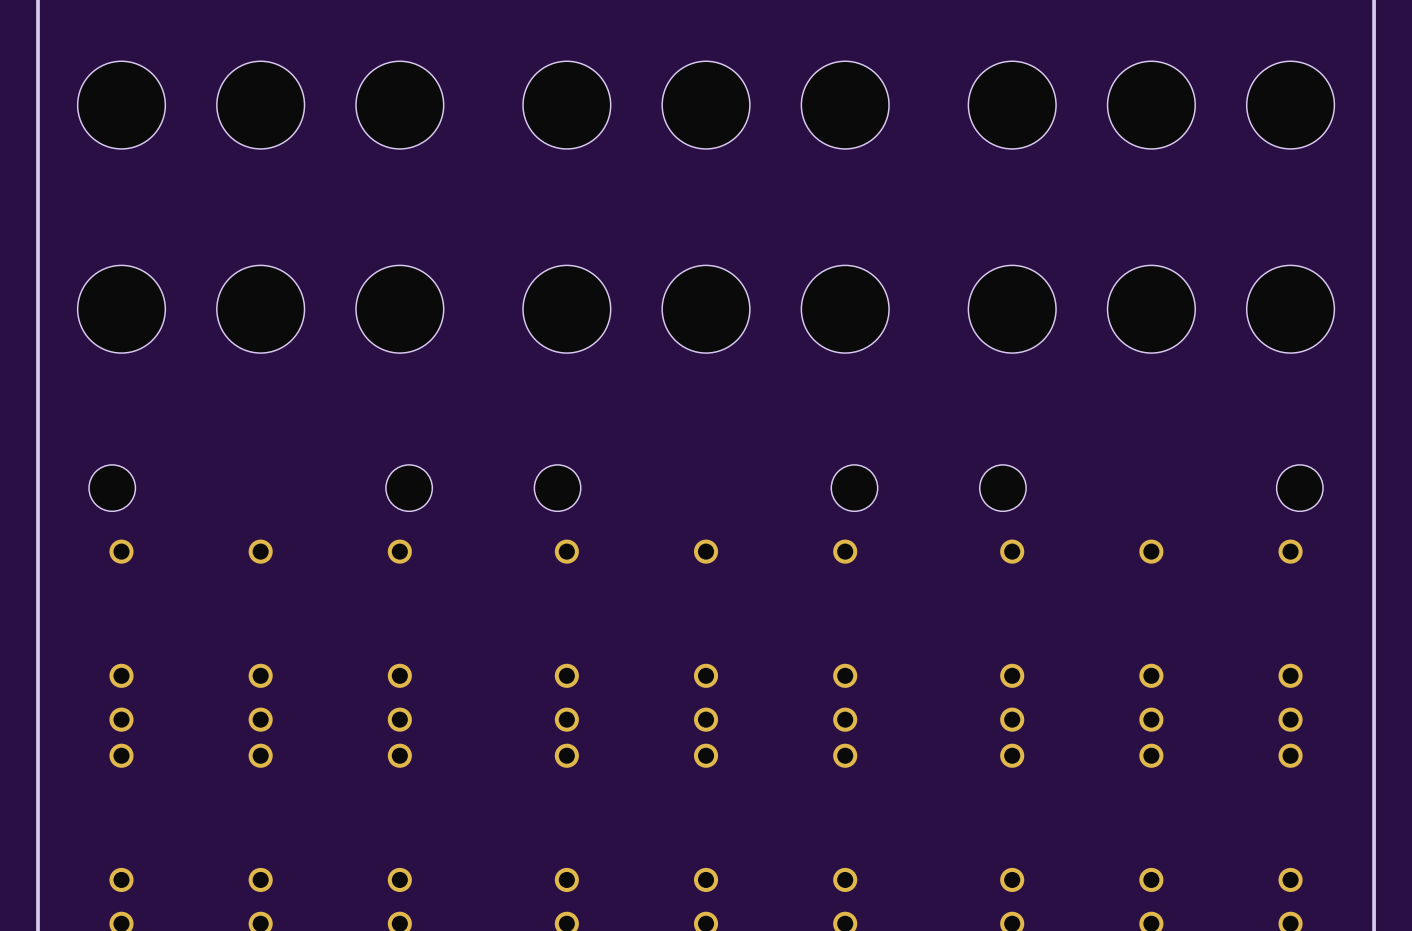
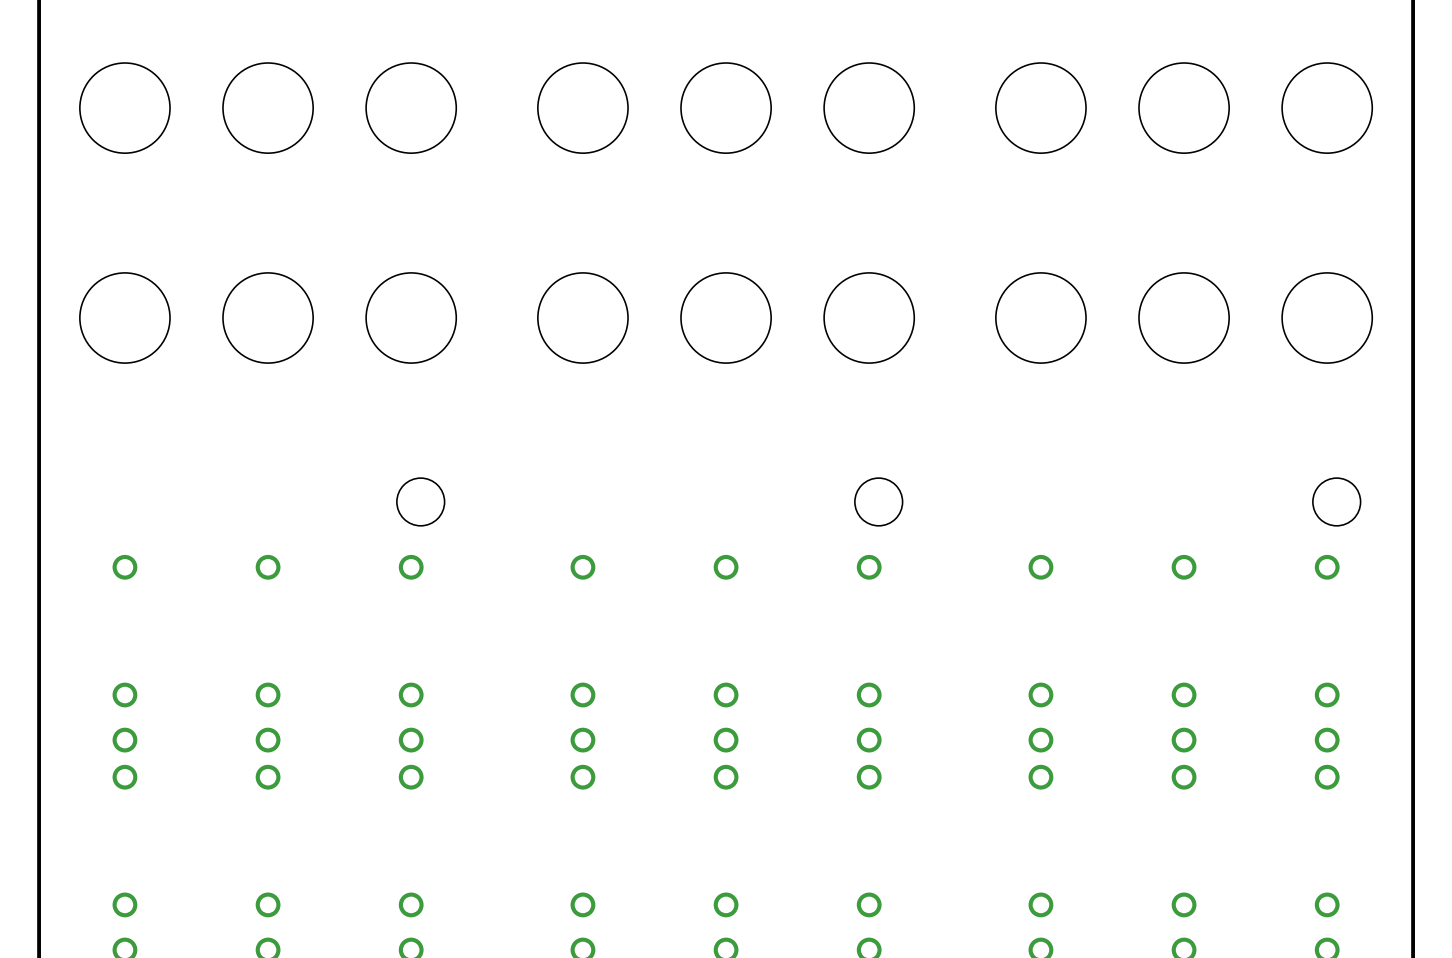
hole: (112, 488) -> none
hole: (557, 488) -> none
hole: (1002, 488) -> none

